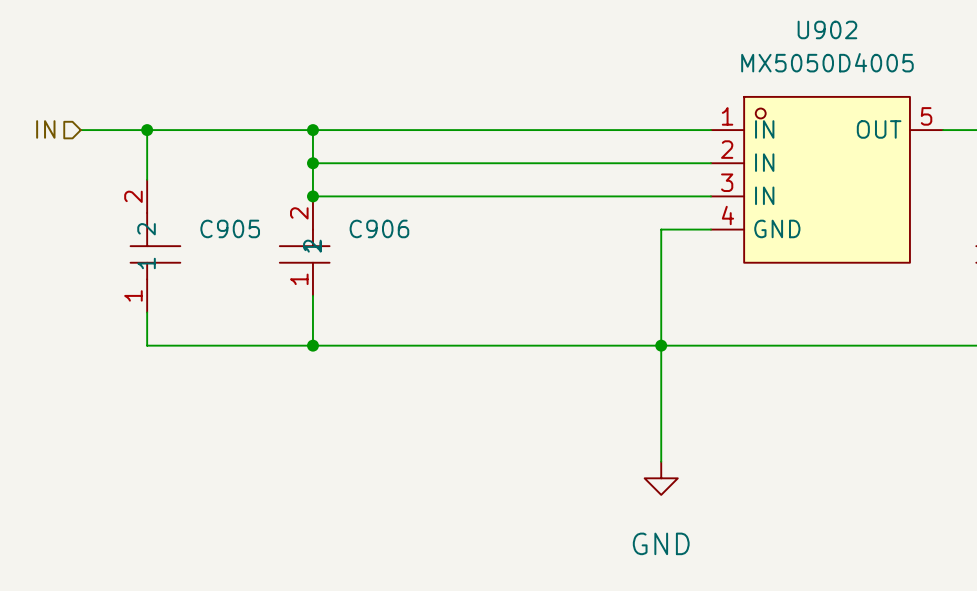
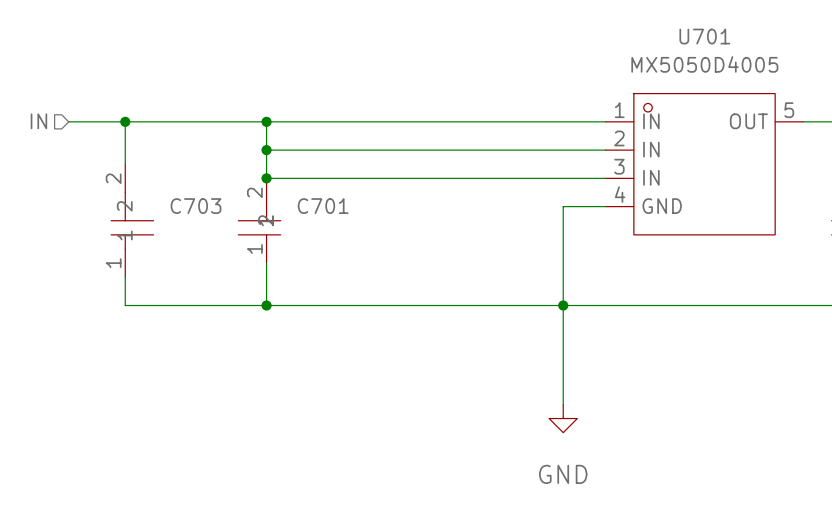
U902 name: U902 (827, 29) -> U701 (704, 36)
C905 name: C905 (230, 228) -> C703 (196, 206)
C906 name: C906 (379, 228) -> C701 (323, 206)

